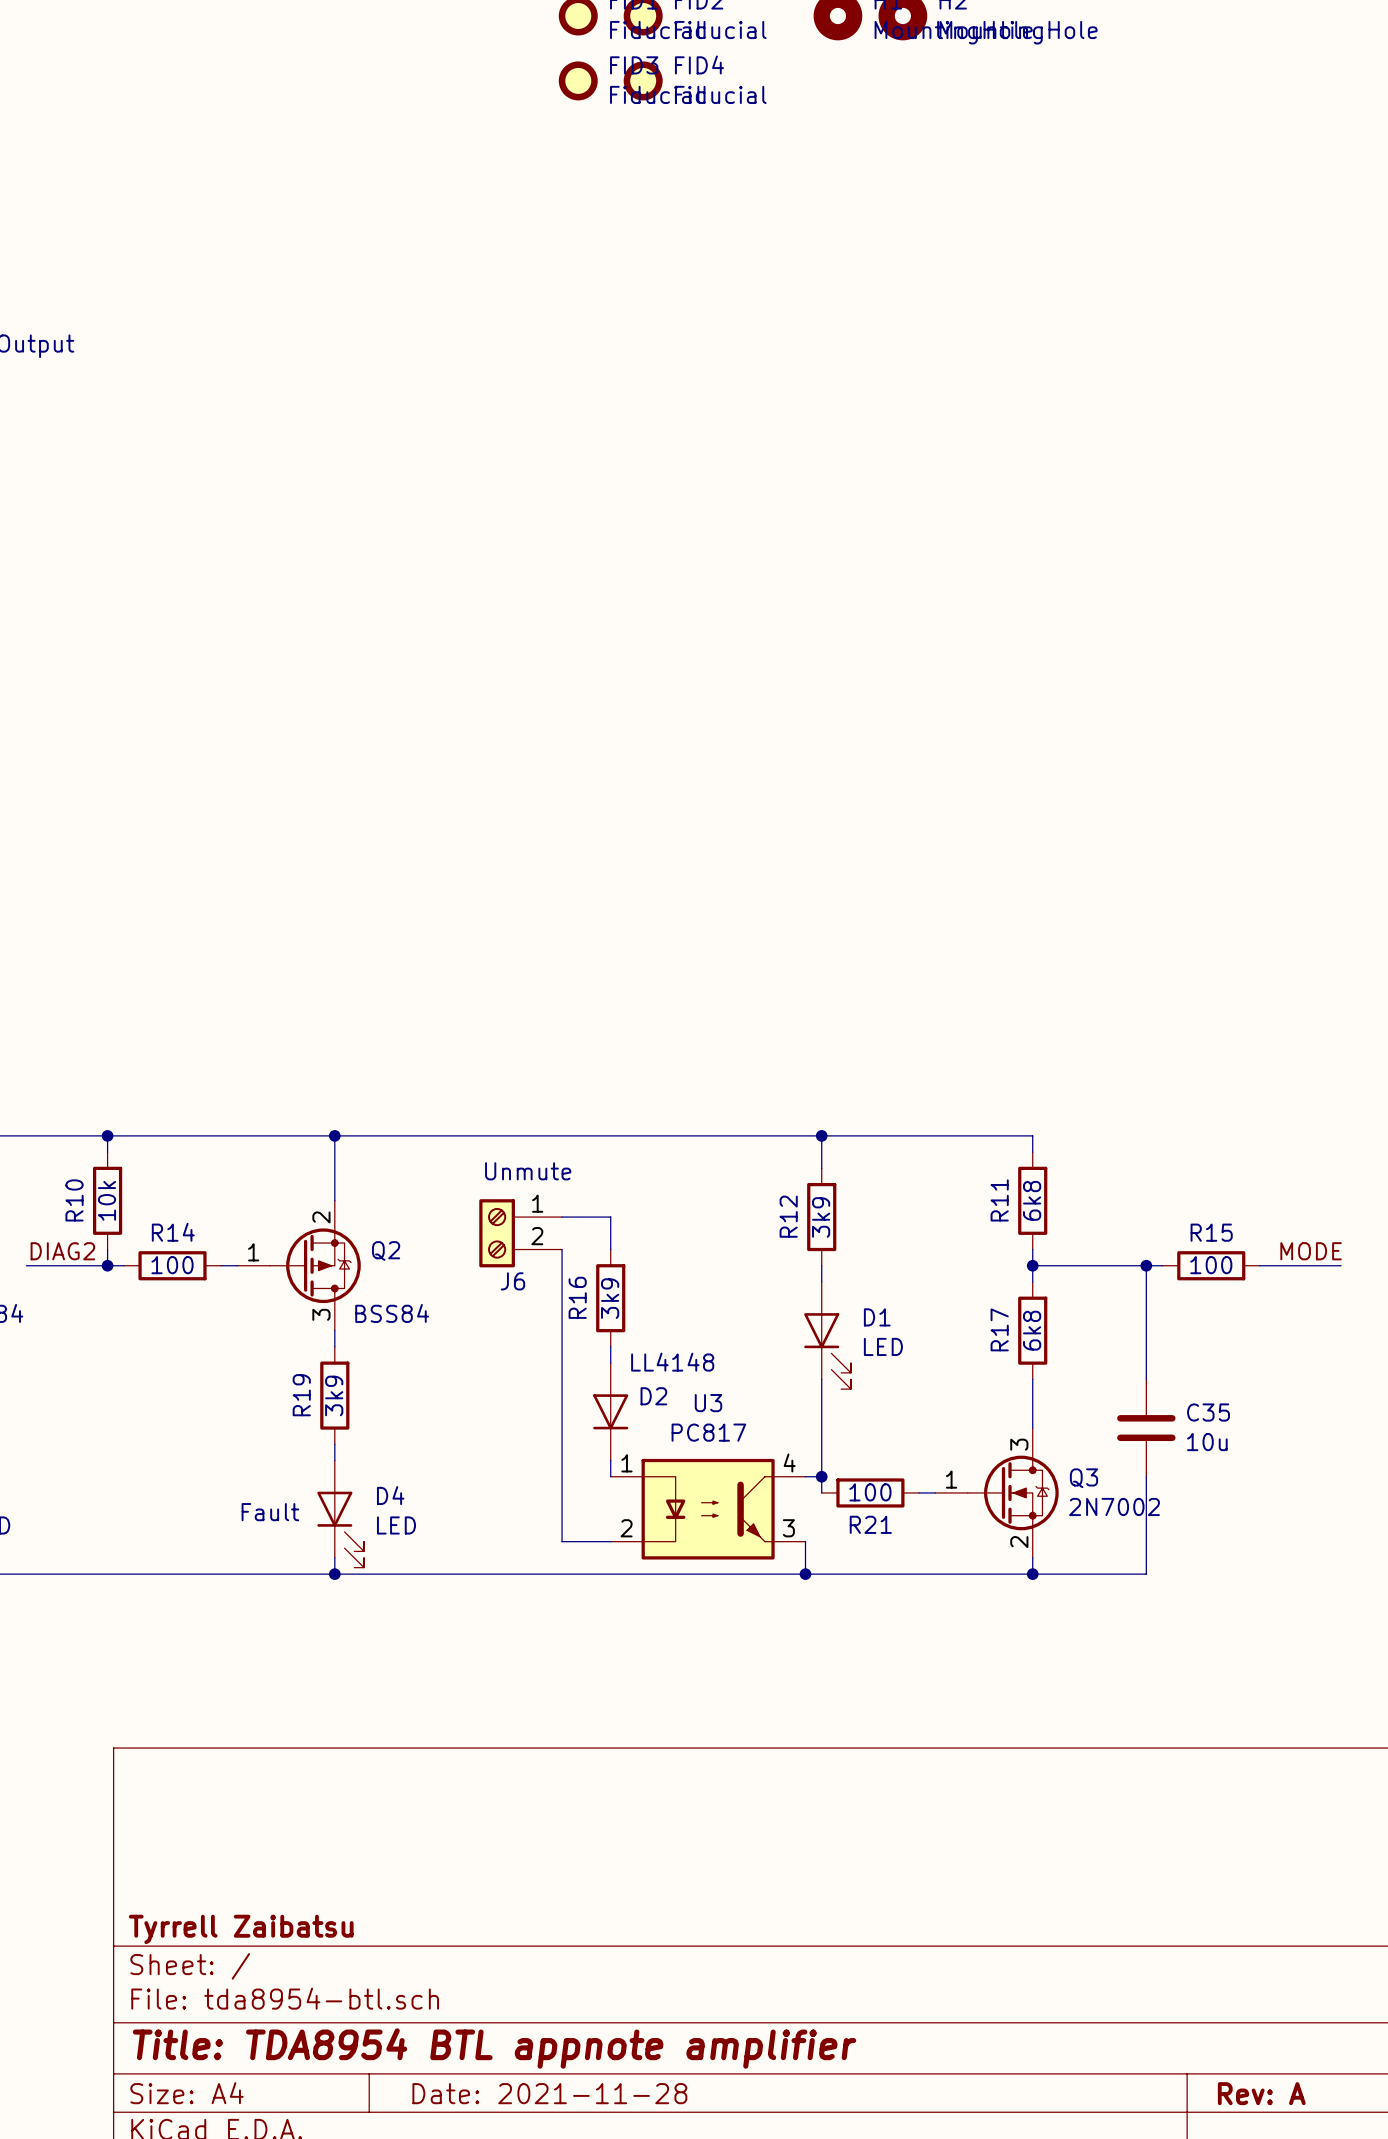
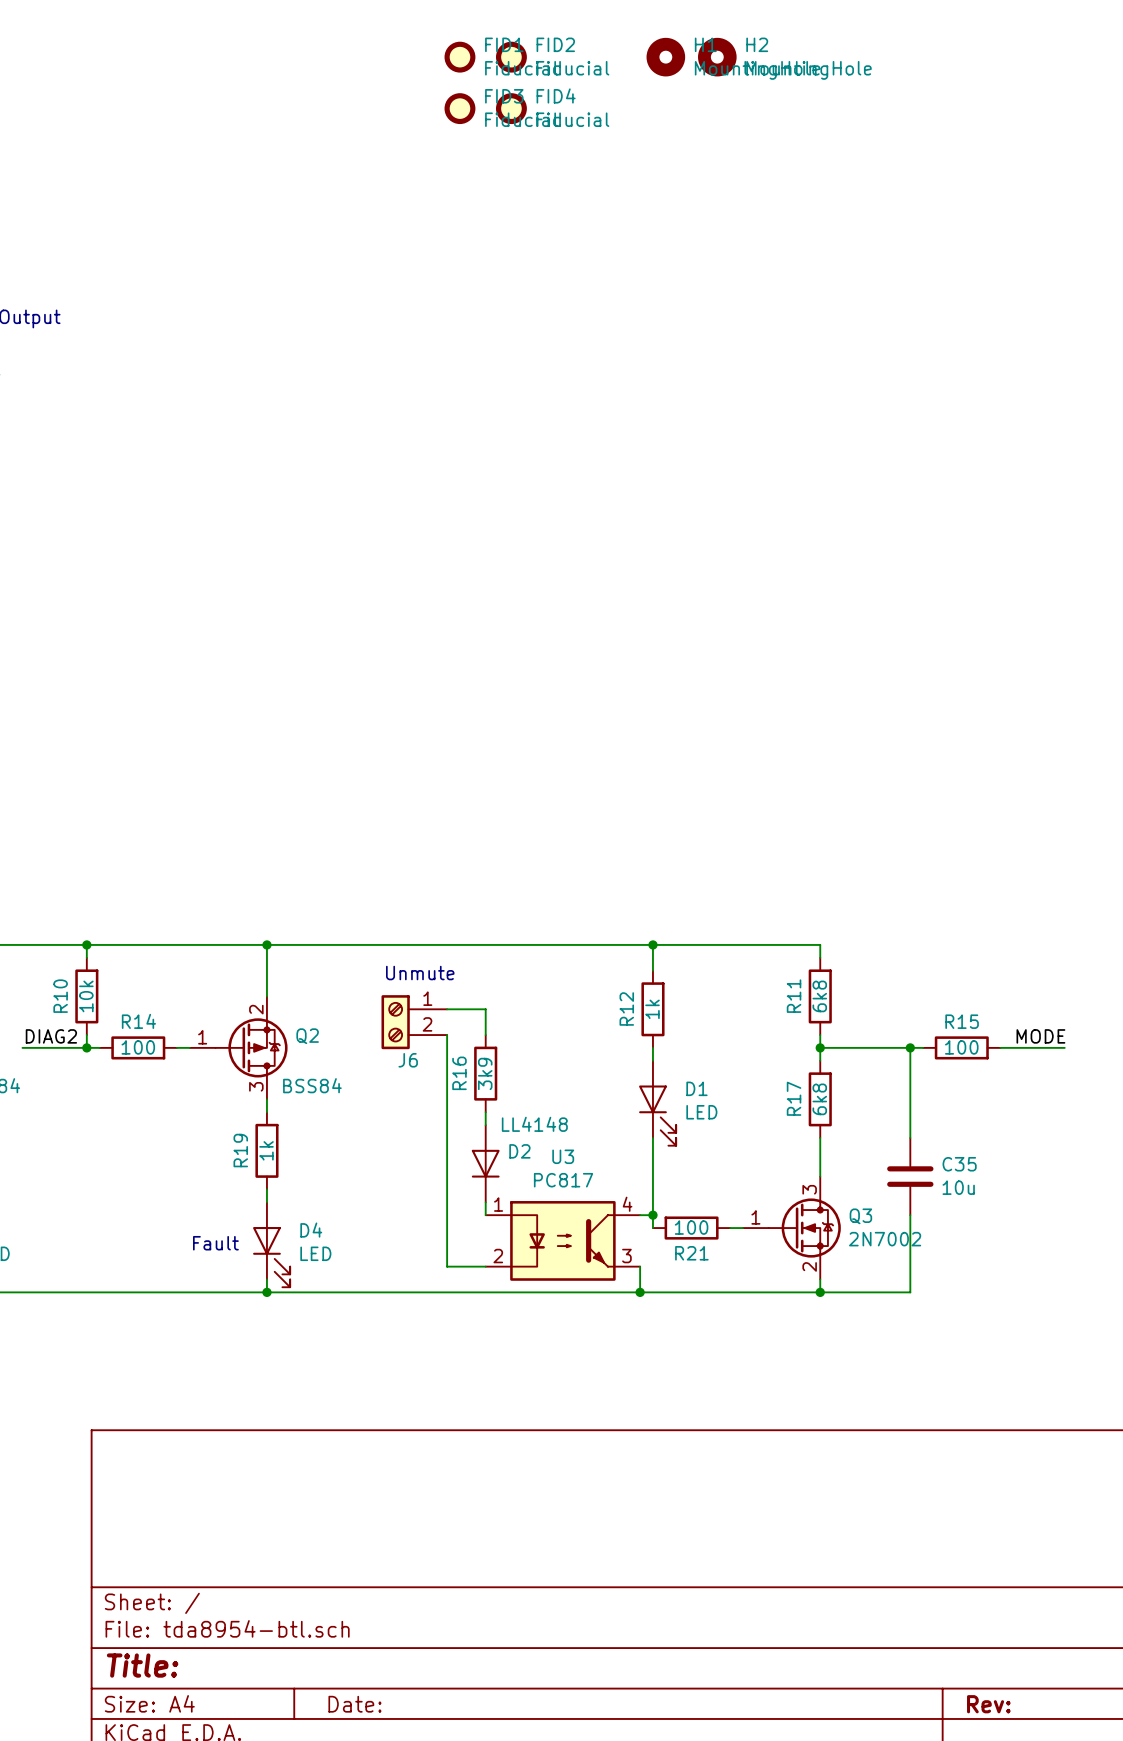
R12 value: 3k9 (821, 1217) -> 1k (652, 1009)
R19 value: 3k9 (334, 1395) -> 1k (266, 1150)
title block: Tyrrell Zaibatsu (241, 1929) -> none
title block: Title: TDA8954 BTL appnote amplifier (494, 2048) -> Title: (142, 1665)
title block: Date: 2021-11-28 (549, 2093) -> Date: (354, 1704)
title block: Rev: A (1261, 2093) -> Rev: (988, 1704)

